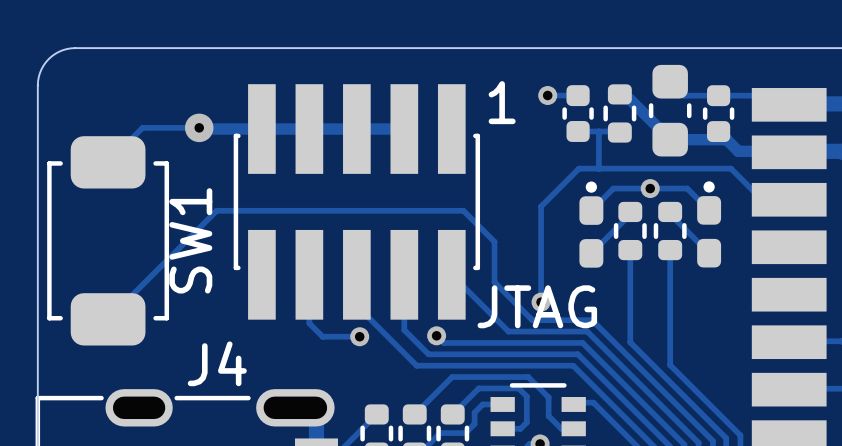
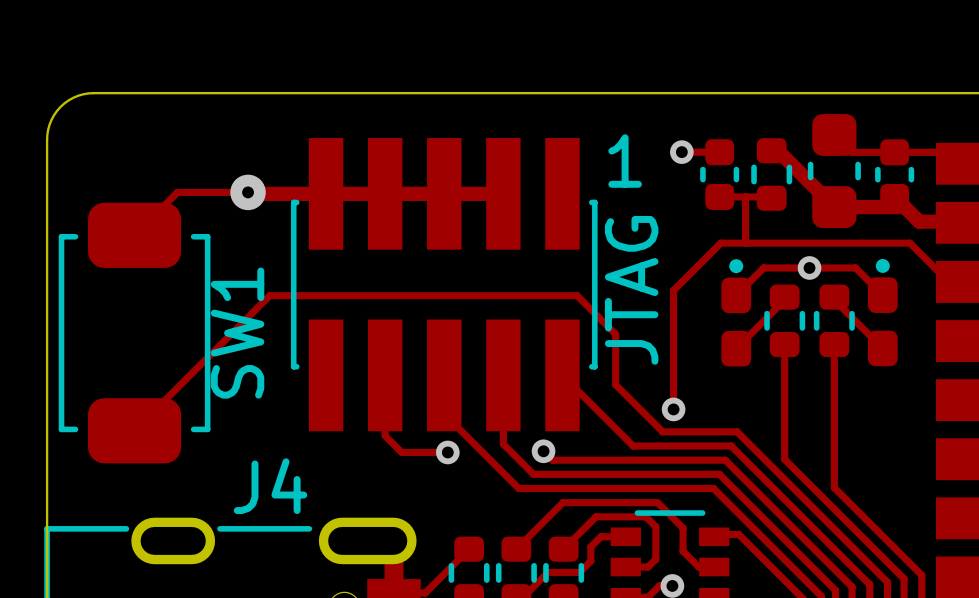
text rotation: 0° (537, 306) -> 90° counterclockwise (631, 290)

